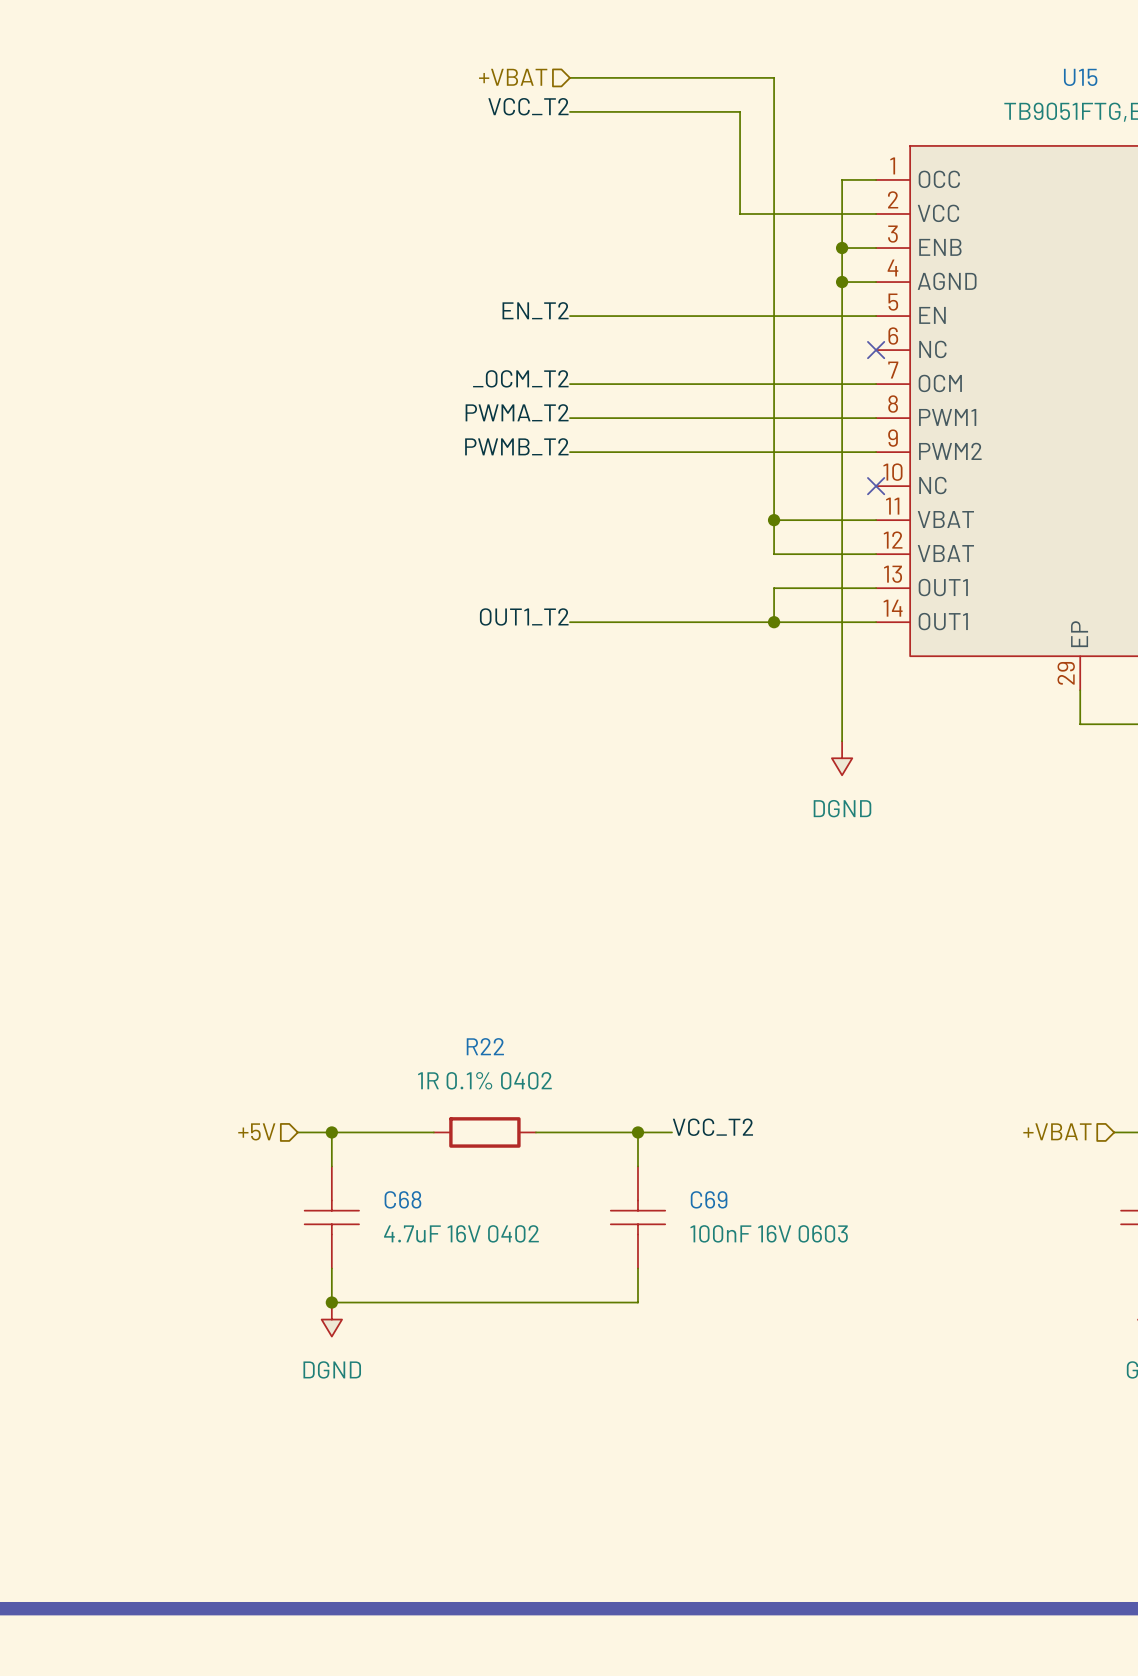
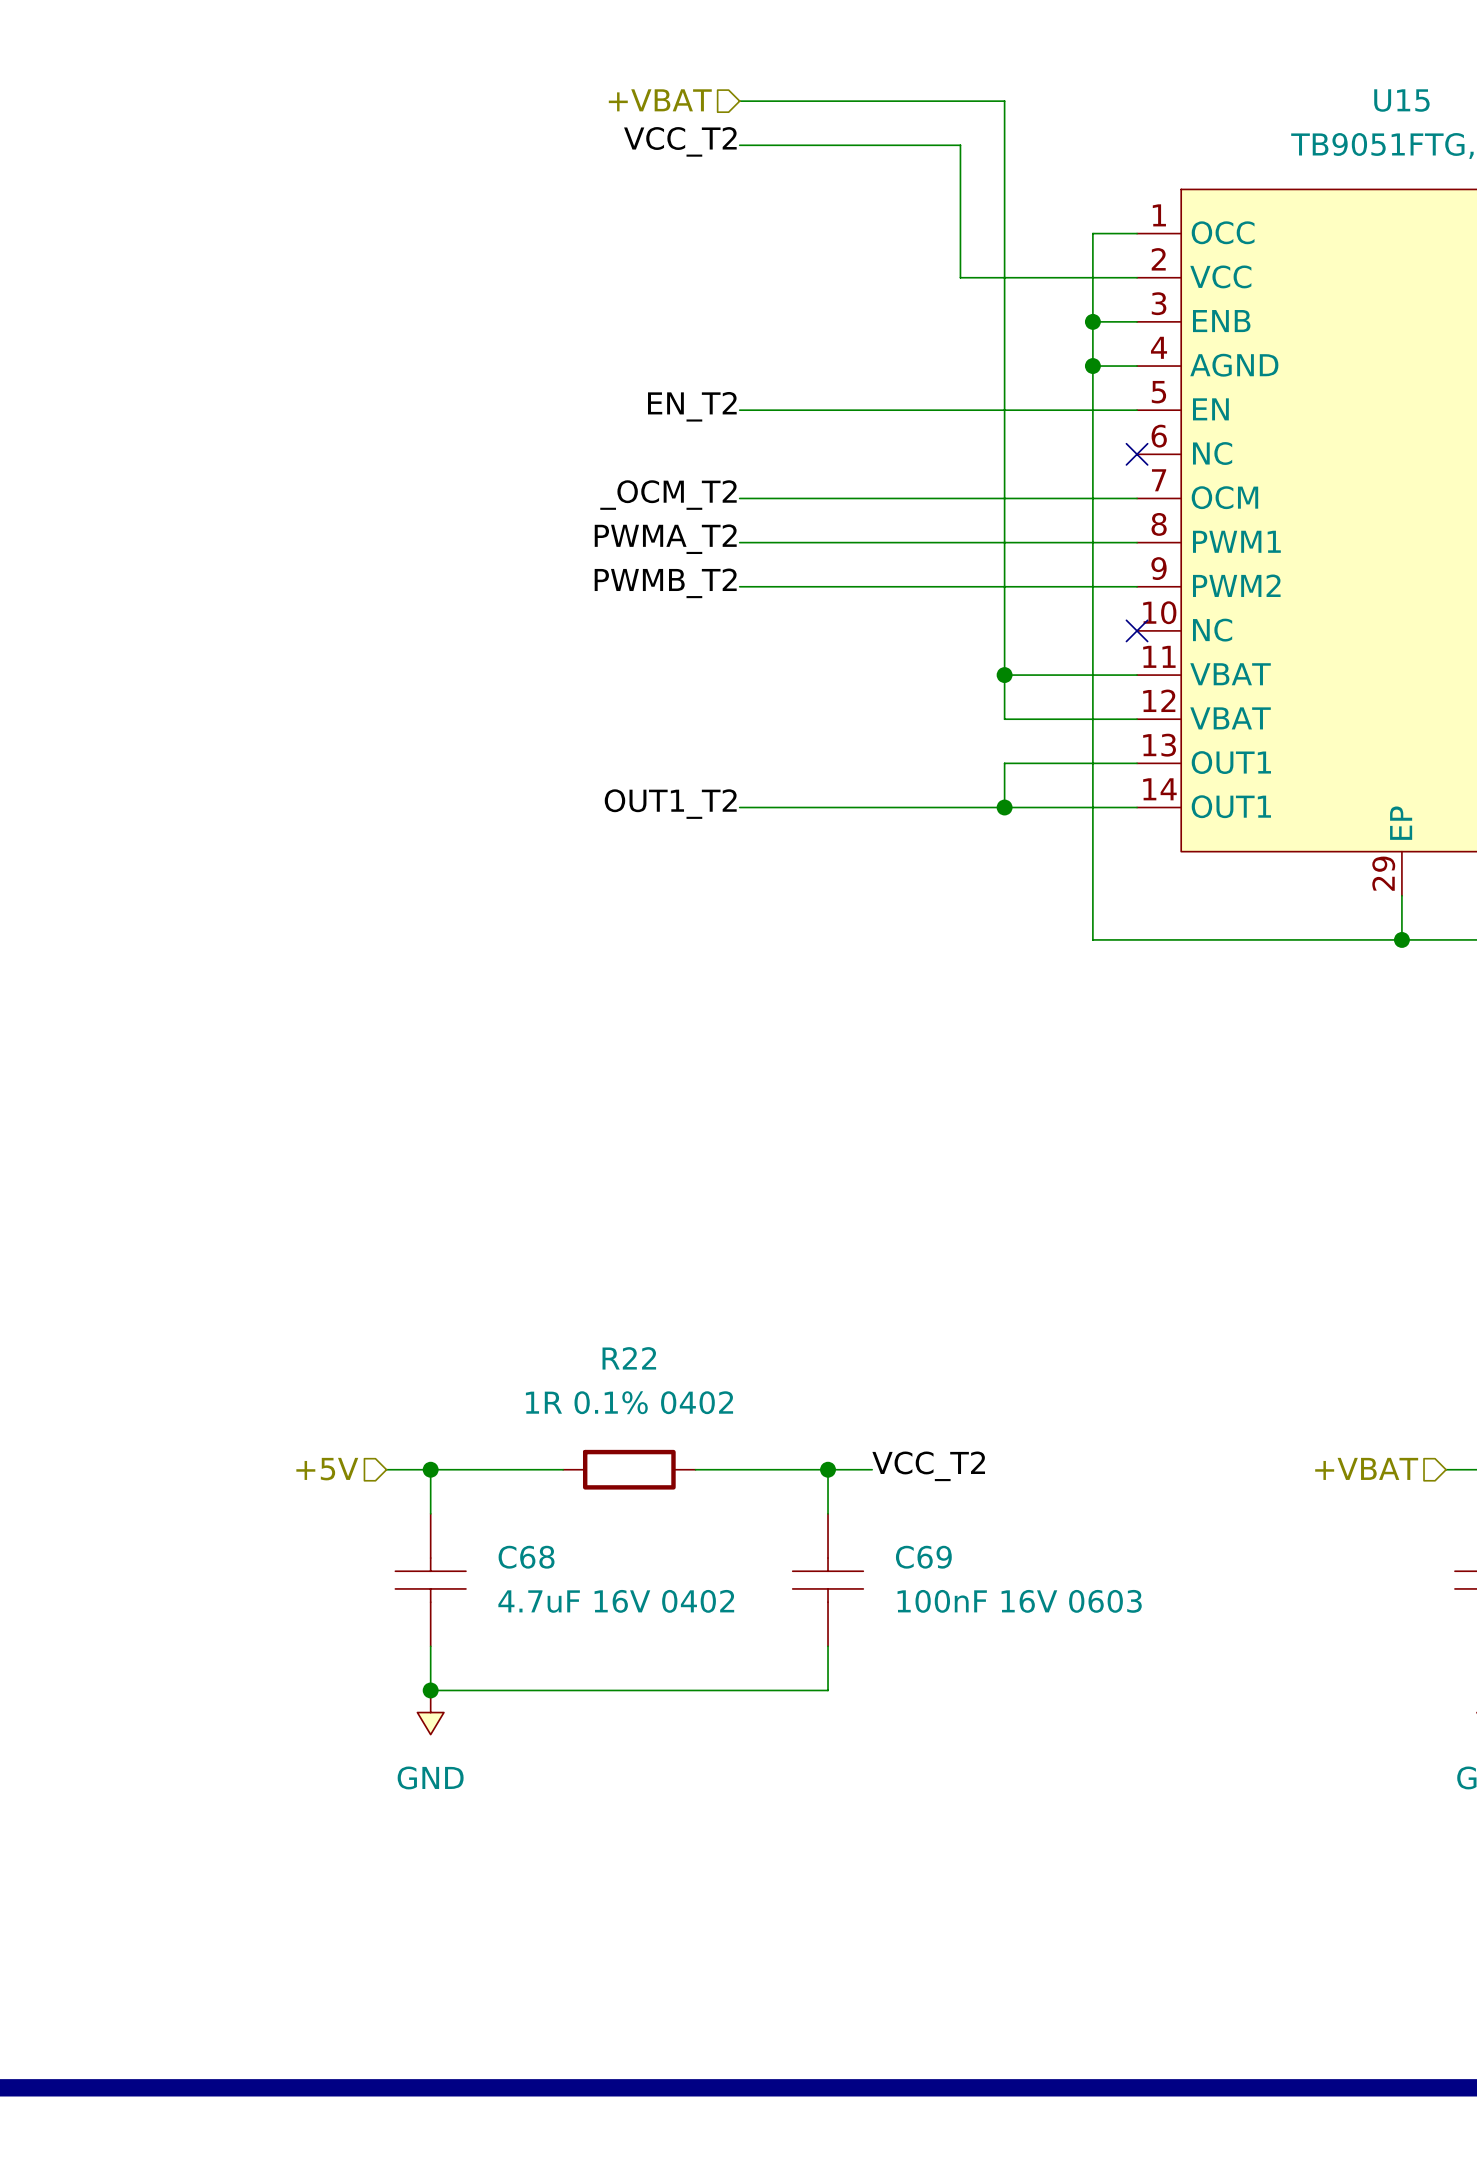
wire: (842, 724) (842, 741) -> (1092, 939) (1401, 939)
junction: none -> (1401, 939)
power symbol: DGND (842, 758) -> none
power symbol: DGND (331, 1319) -> GND (430, 1712)

